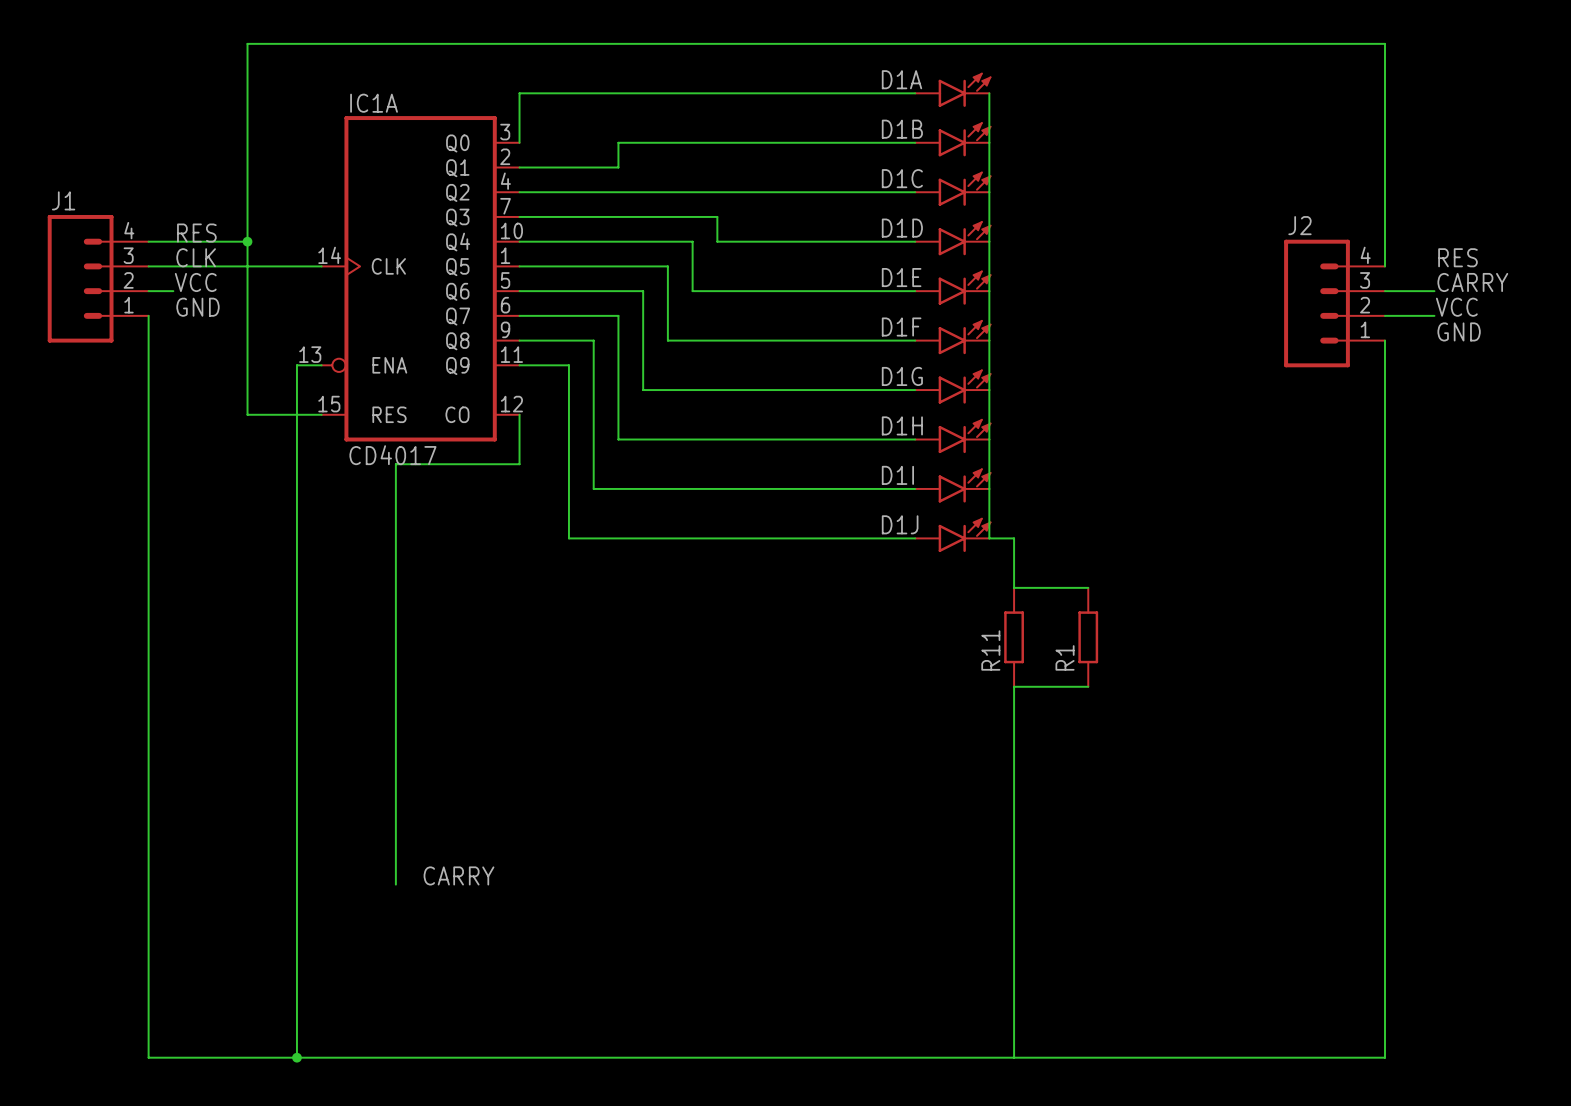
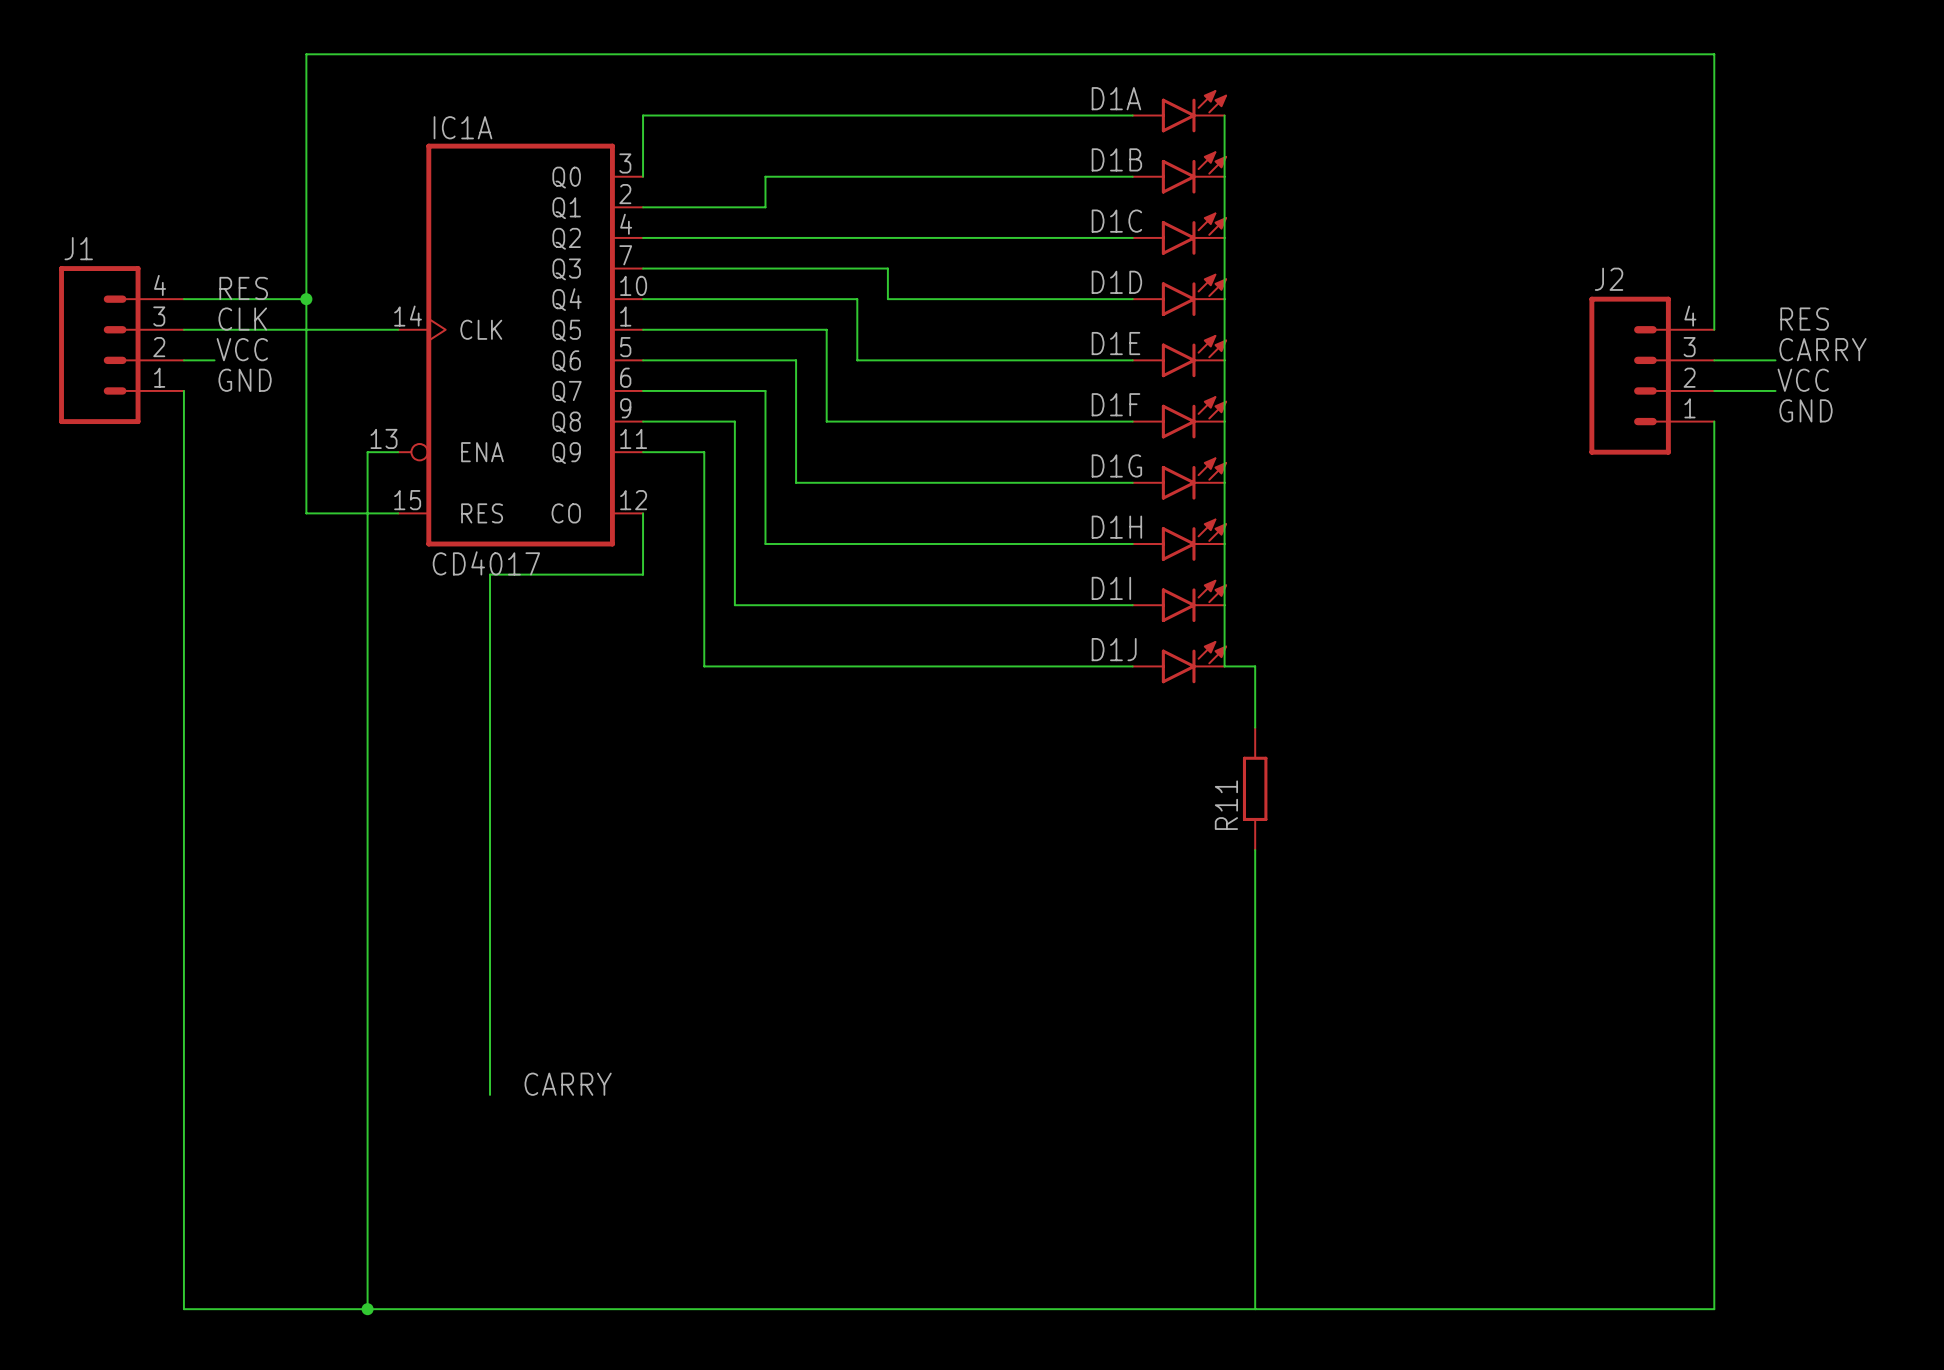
wire: (1014, 587) (1088, 587) -> none
R1: (1088, 637) -> none
wire: (1014, 686) (1088, 686) -> none

